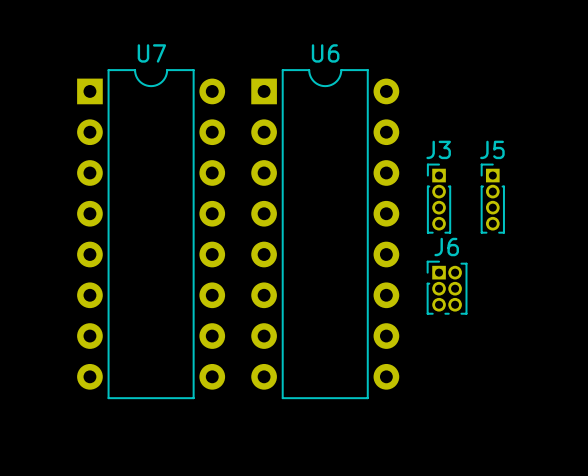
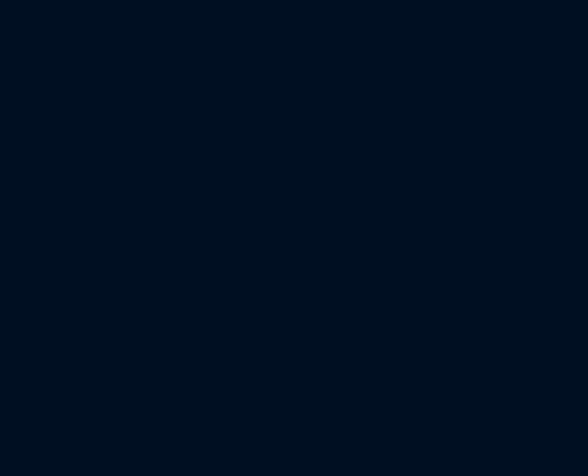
J3: (439, 198) -> none
J5: (492, 198) -> none
U7: (151, 234) -> none
U6: (325, 234) -> none
J6: (447, 287) -> none

